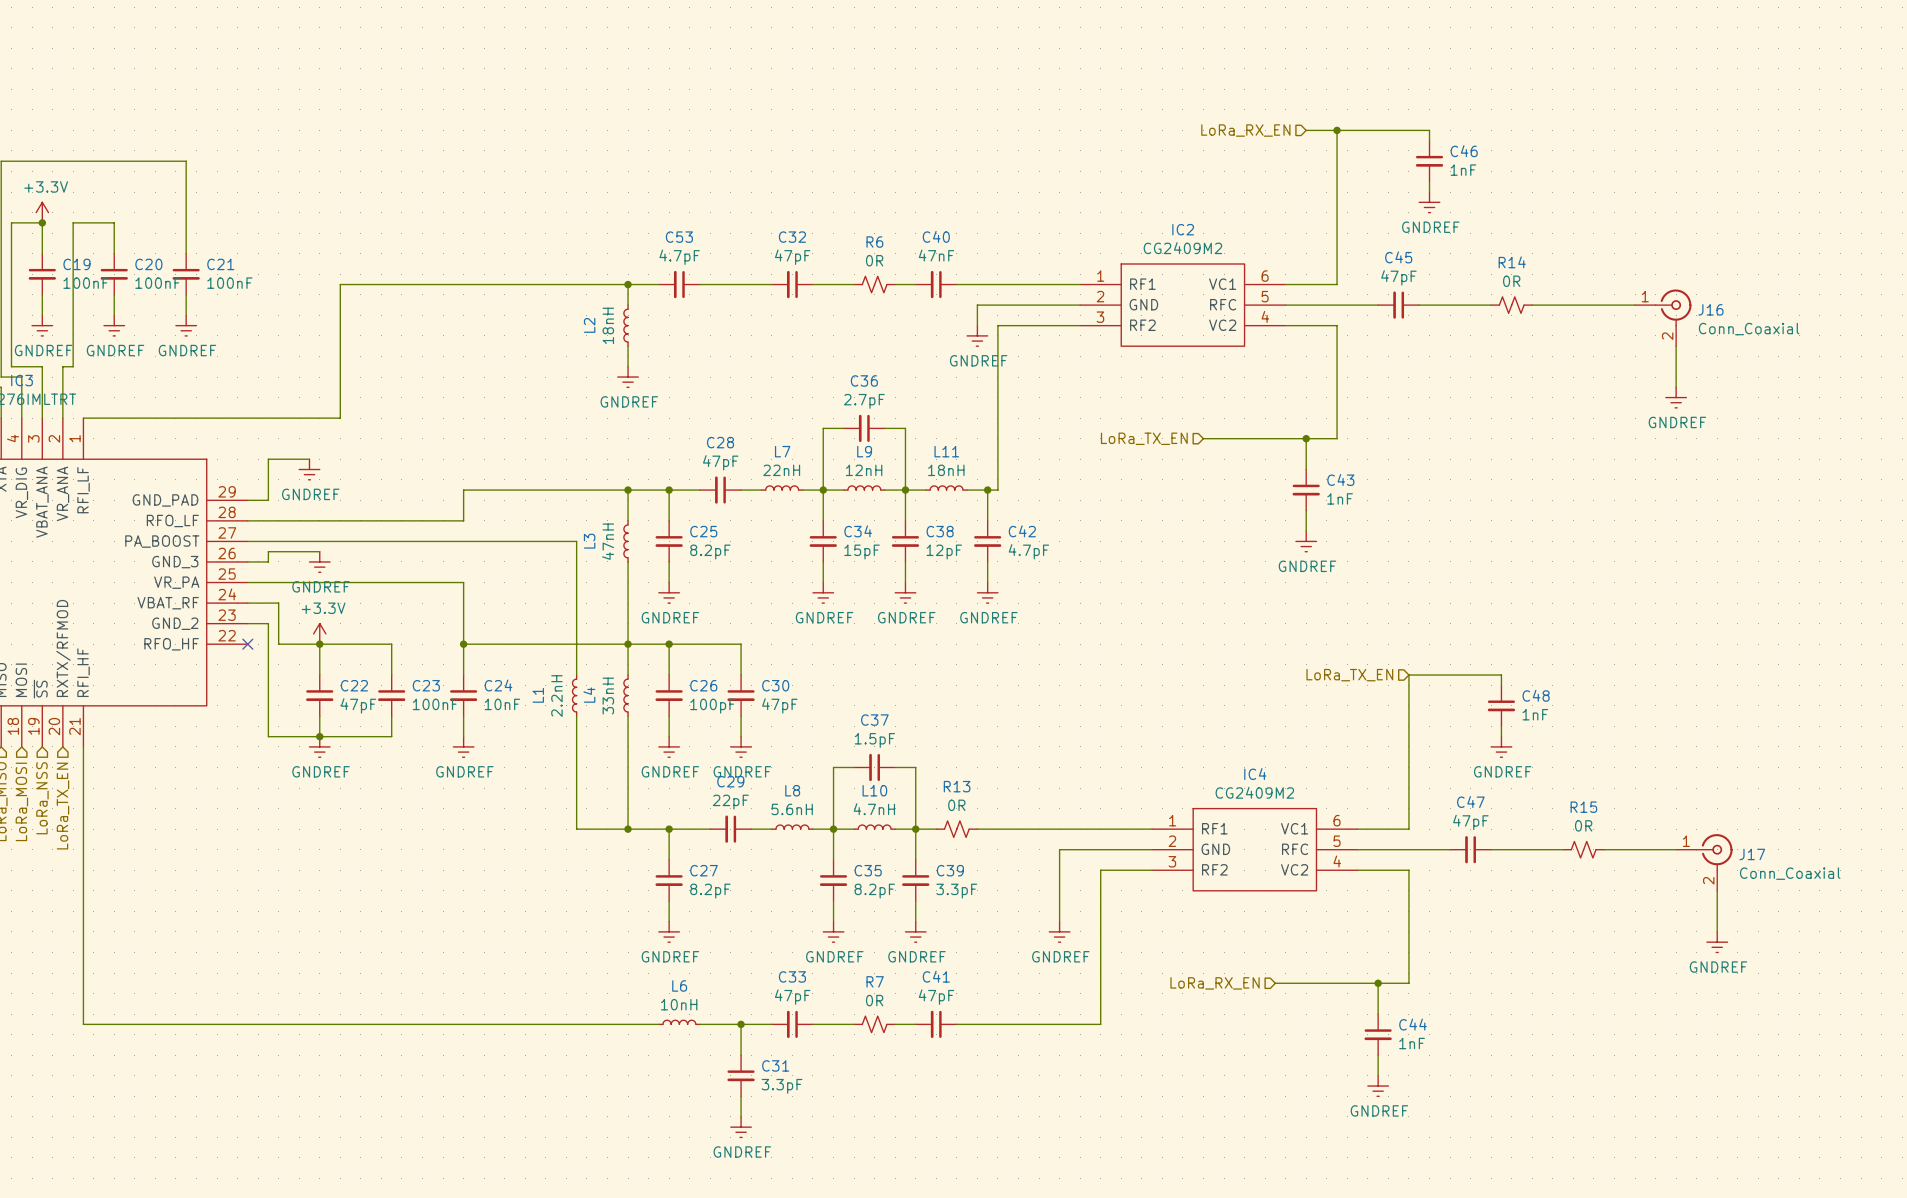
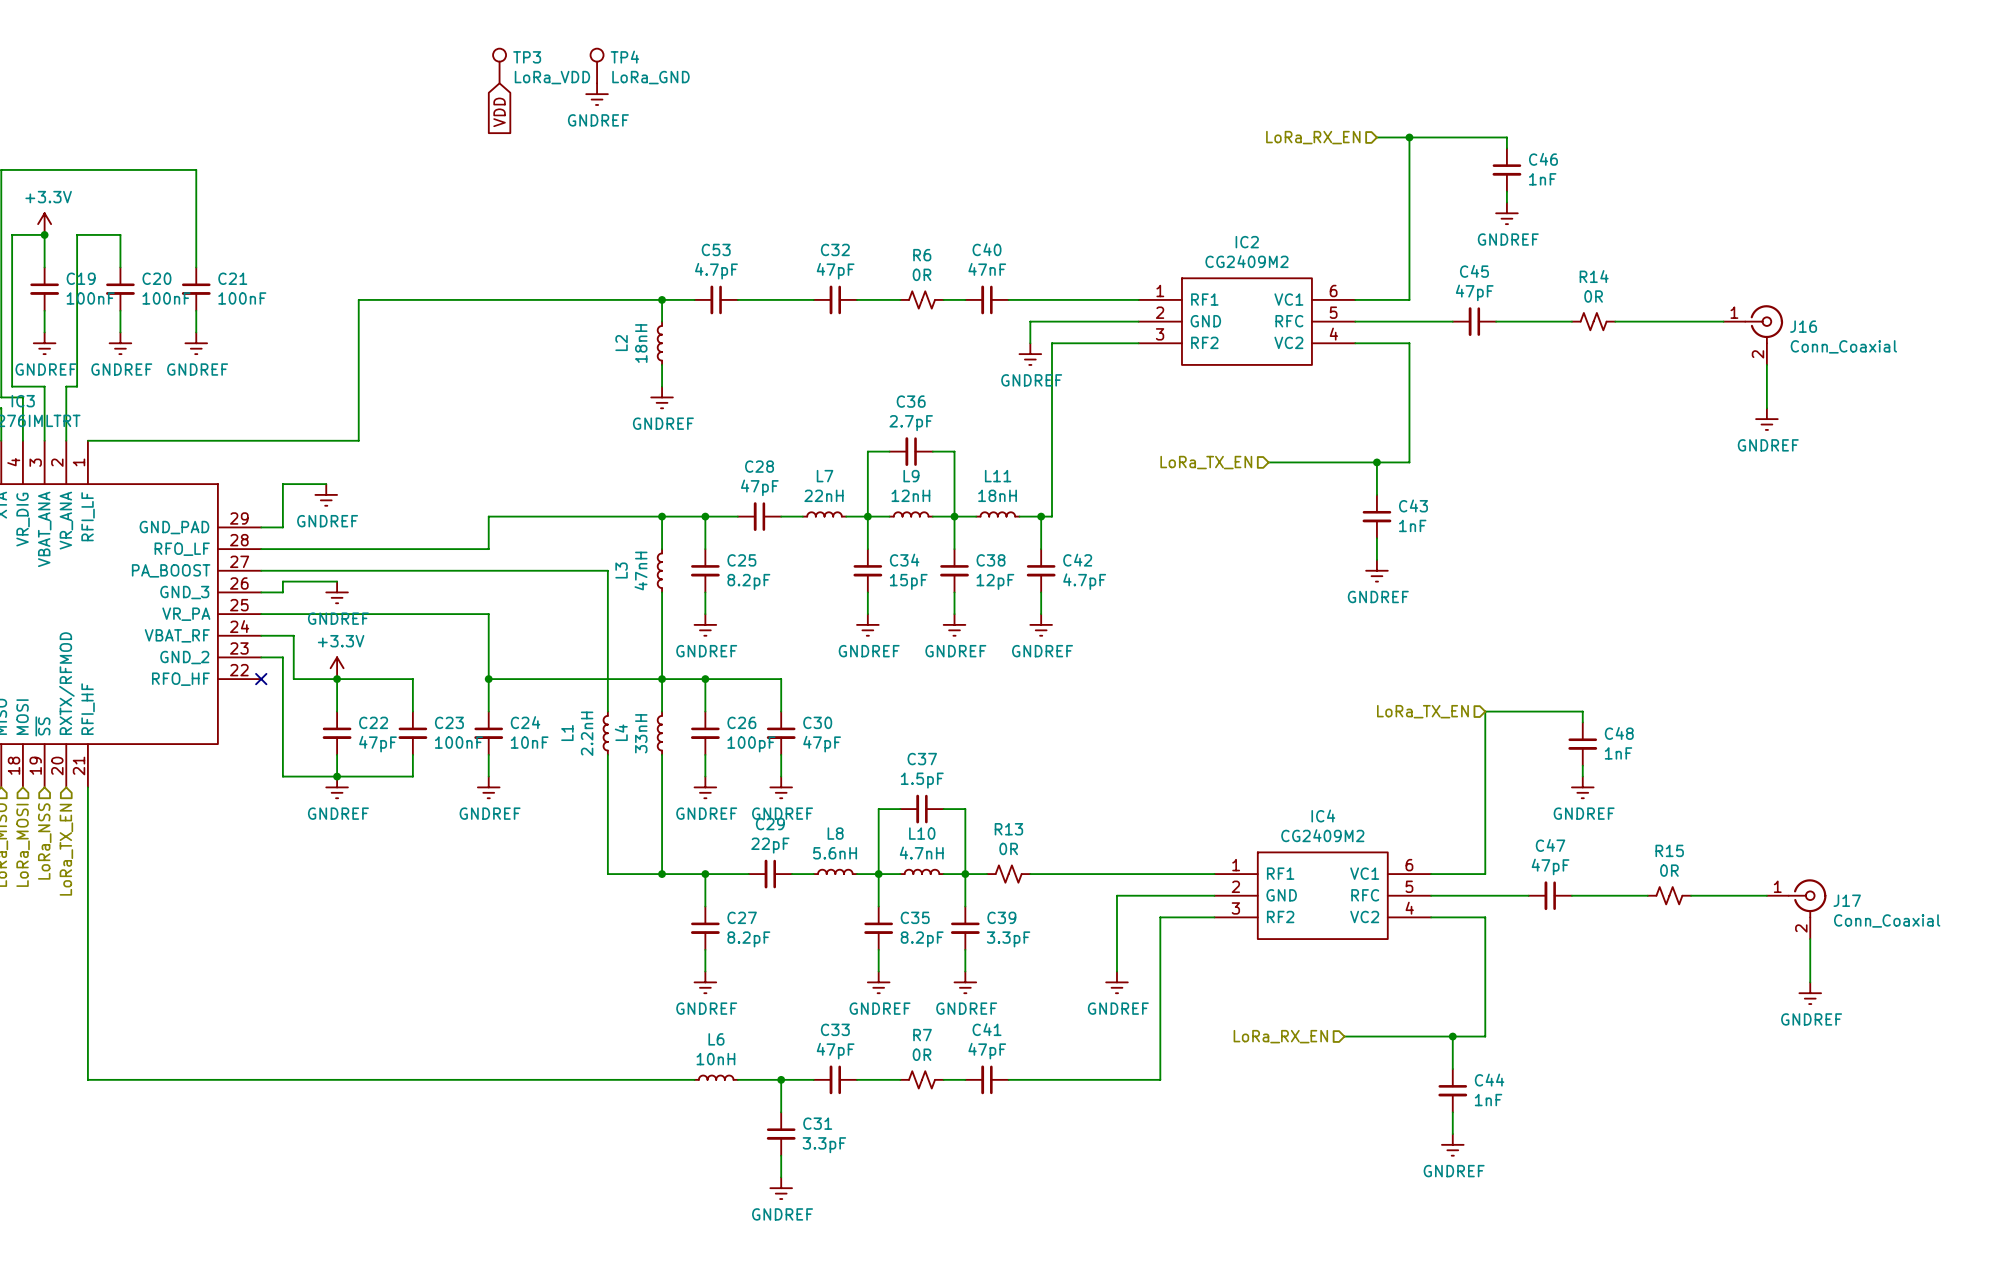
TP3: none -> LoRa_VDD (499, 65)
TP4: none -> LoRa_GND (597, 65)
power symbol: none -> GNDREF (597, 94)
global label: none -> VDD (499, 112)

